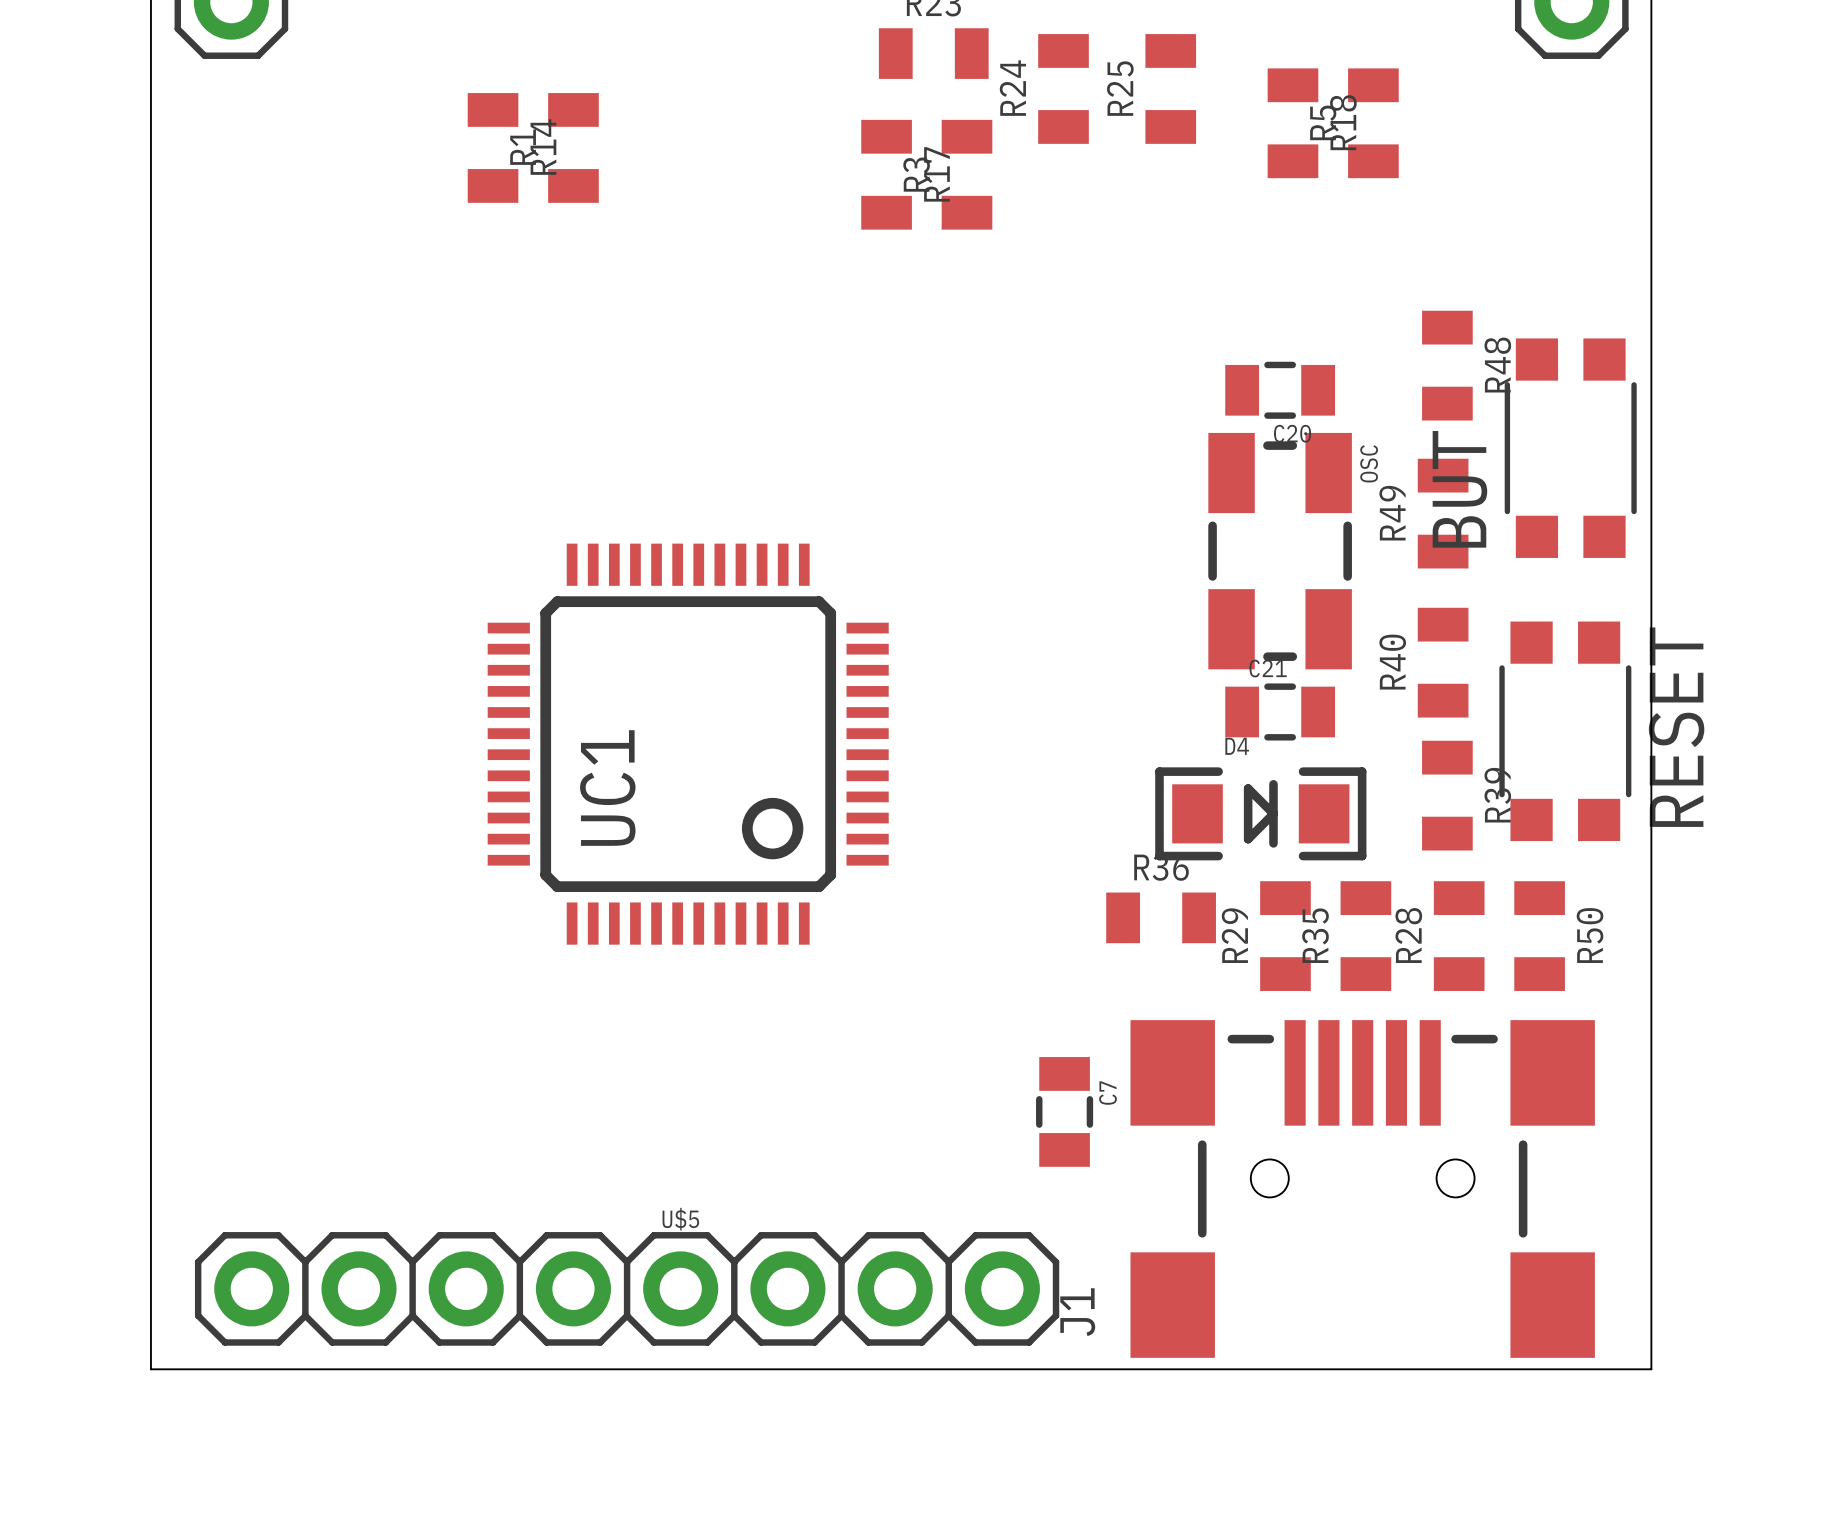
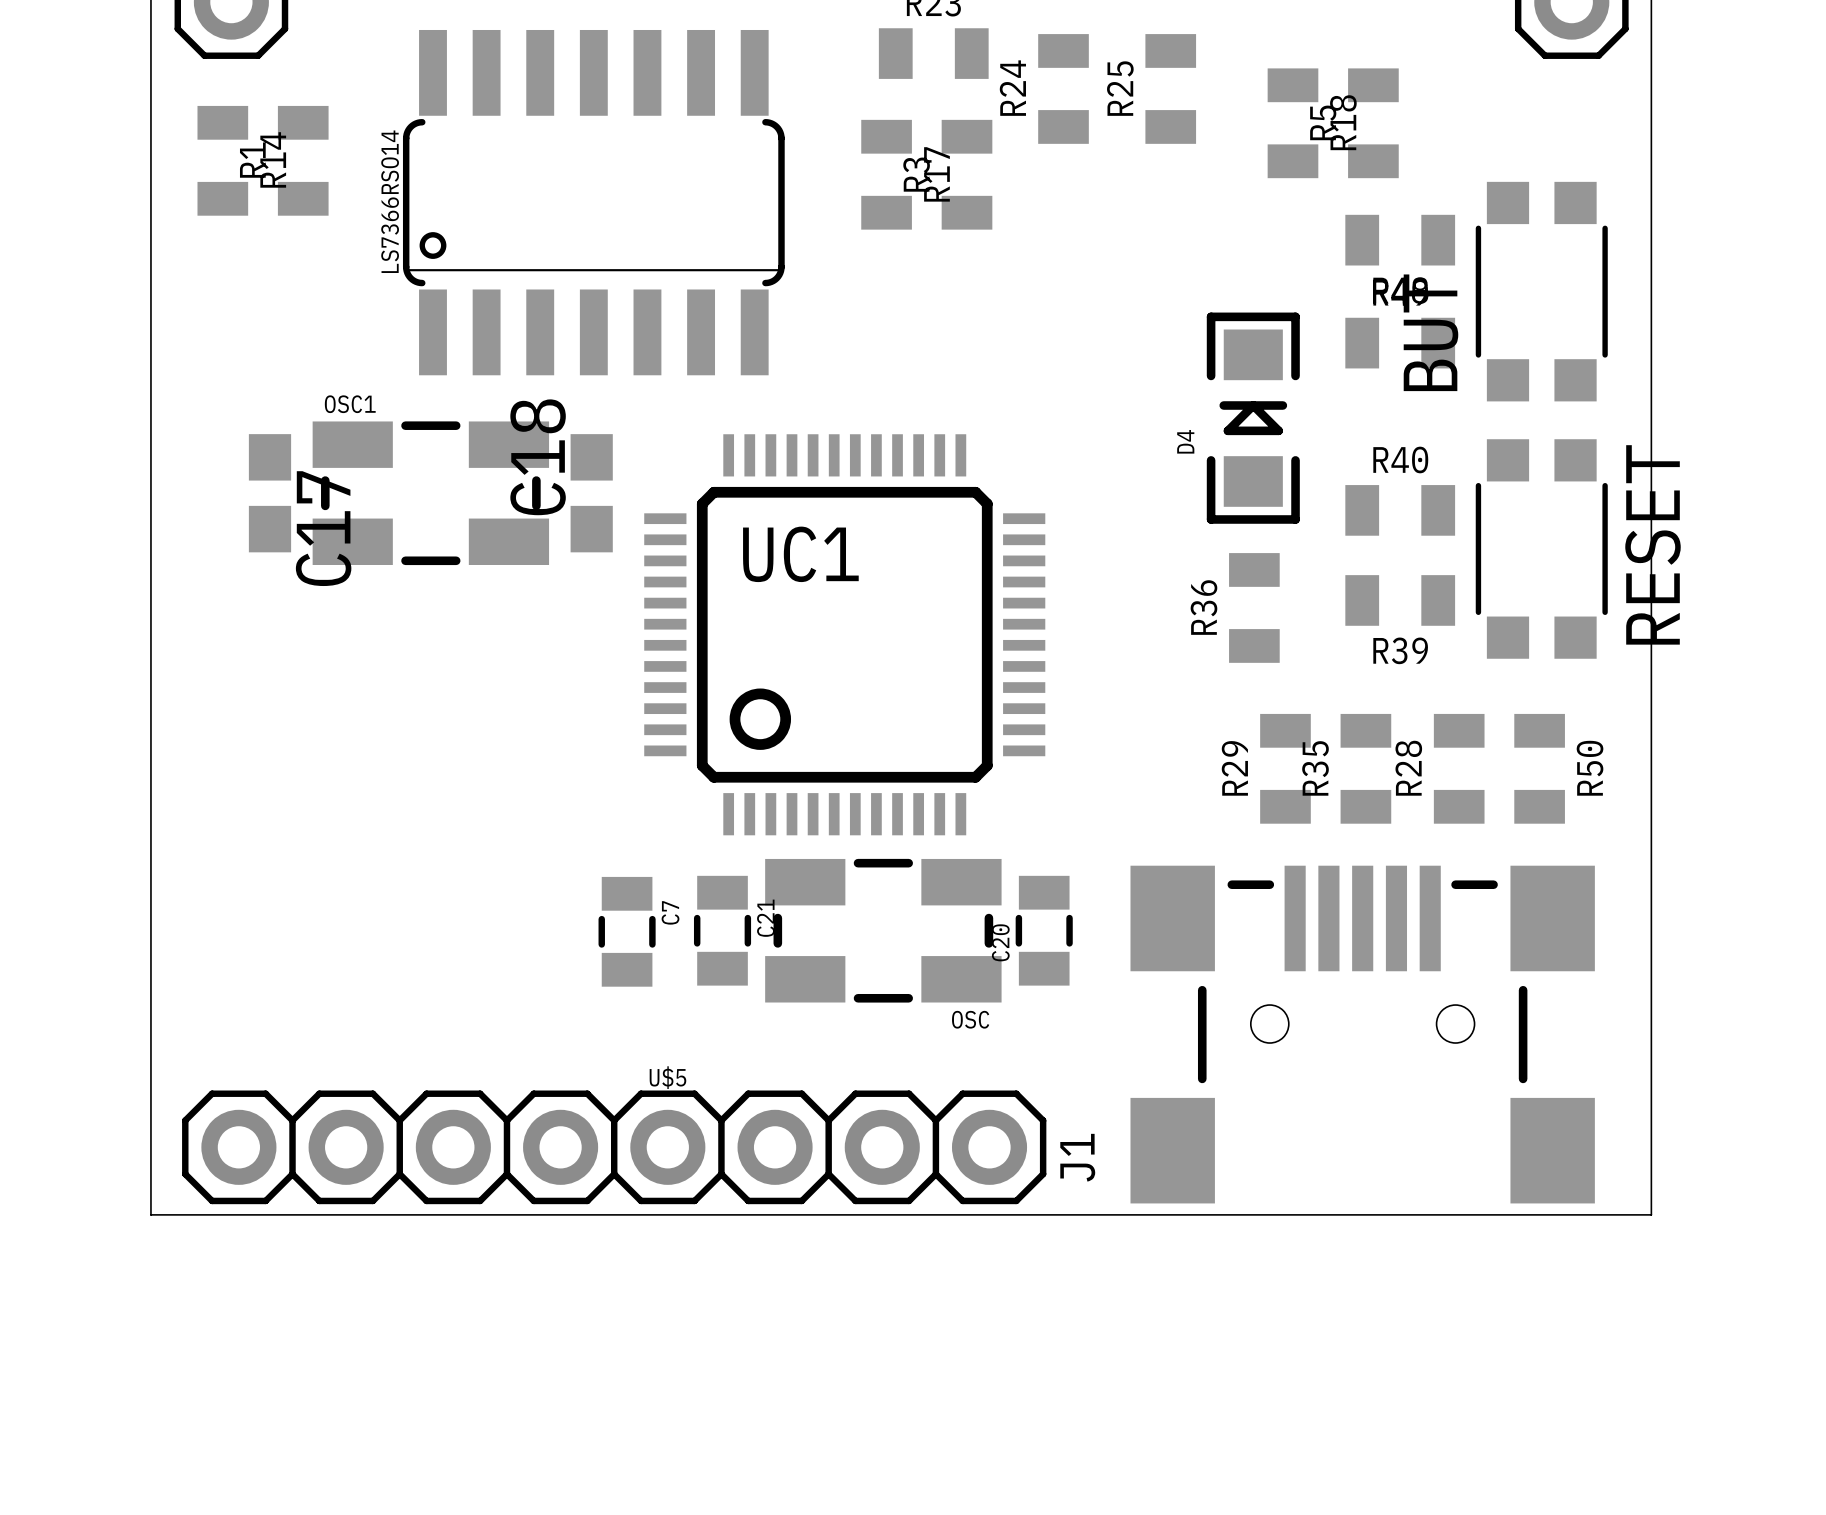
R14 position: (493, 147) -> (222, 160)
R1 position: (573, 147) -> (303, 160)
part: none -> LS7366RSO14 (593, 202)
R48 rotation: 0° (1447, 365) -> 90° clockwise (1400, 240)
R48 position: (1447, 365) -> (1400, 240)
C20 rotation: 0° (1280, 390) -> 90° clockwise (1044, 930)
C20 position: (1280, 390) -> (1044, 930)
BUT position: (1570, 448) -> (1541, 291)
C17: none -> (270, 493)
OSC1: none -> (430, 493)
C18: none -> (591, 493)
R49 rotation: 0° (1443, 513) -> 90° clockwise (1400, 343)
R49 position: (1443, 513) -> (1400, 343)
OSC rotation: 0° (1280, 551) -> 90° clockwise (883, 930)
OSC position: (1280, 551) -> (883, 930)
R40 rotation: 0° (1443, 662) -> 90° clockwise (1400, 510)
R40 position: (1443, 662) -> (1400, 510)
C21 rotation: 0° (1280, 711) -> 90° clockwise (722, 930)
C21 position: (1280, 711) -> (722, 930)
RESET position: (1565, 731) -> (1541, 548)
UC1 rotation: 0° (688, 744) -> 90° clockwise (844, 634)
R39 rotation: 0° (1447, 795) -> 90° clockwise (1400, 600)
R39 position: (1447, 795) -> (1400, 600)
D4 rotation: 0° (1260, 813) -> 90° counterclockwise (1253, 418)
D4 position: (1260, 813) -> (1253, 418)
R36 rotation: 0° (1161, 917) -> 90° clockwise (1254, 607)
R36 position: (1161, 917) -> (1254, 607)
R29 position: (1285, 936) -> (1285, 768)
R35 position: (1365, 936) -> (1365, 768)
R28 position: (1459, 936) -> (1459, 768)
R50 position: (1539, 936) -> (1539, 768)
C7 position: (1064, 1111) -> (627, 931)
J1 position: (1362, 1188) -> (1362, 1034)
board edge: (150, 1214) (150, 1369) (1651, 1369) (1651, 1214) -> (150, 1214) (1651, 1214)
U$5 position: (627, 1288) -> (614, 1147)

